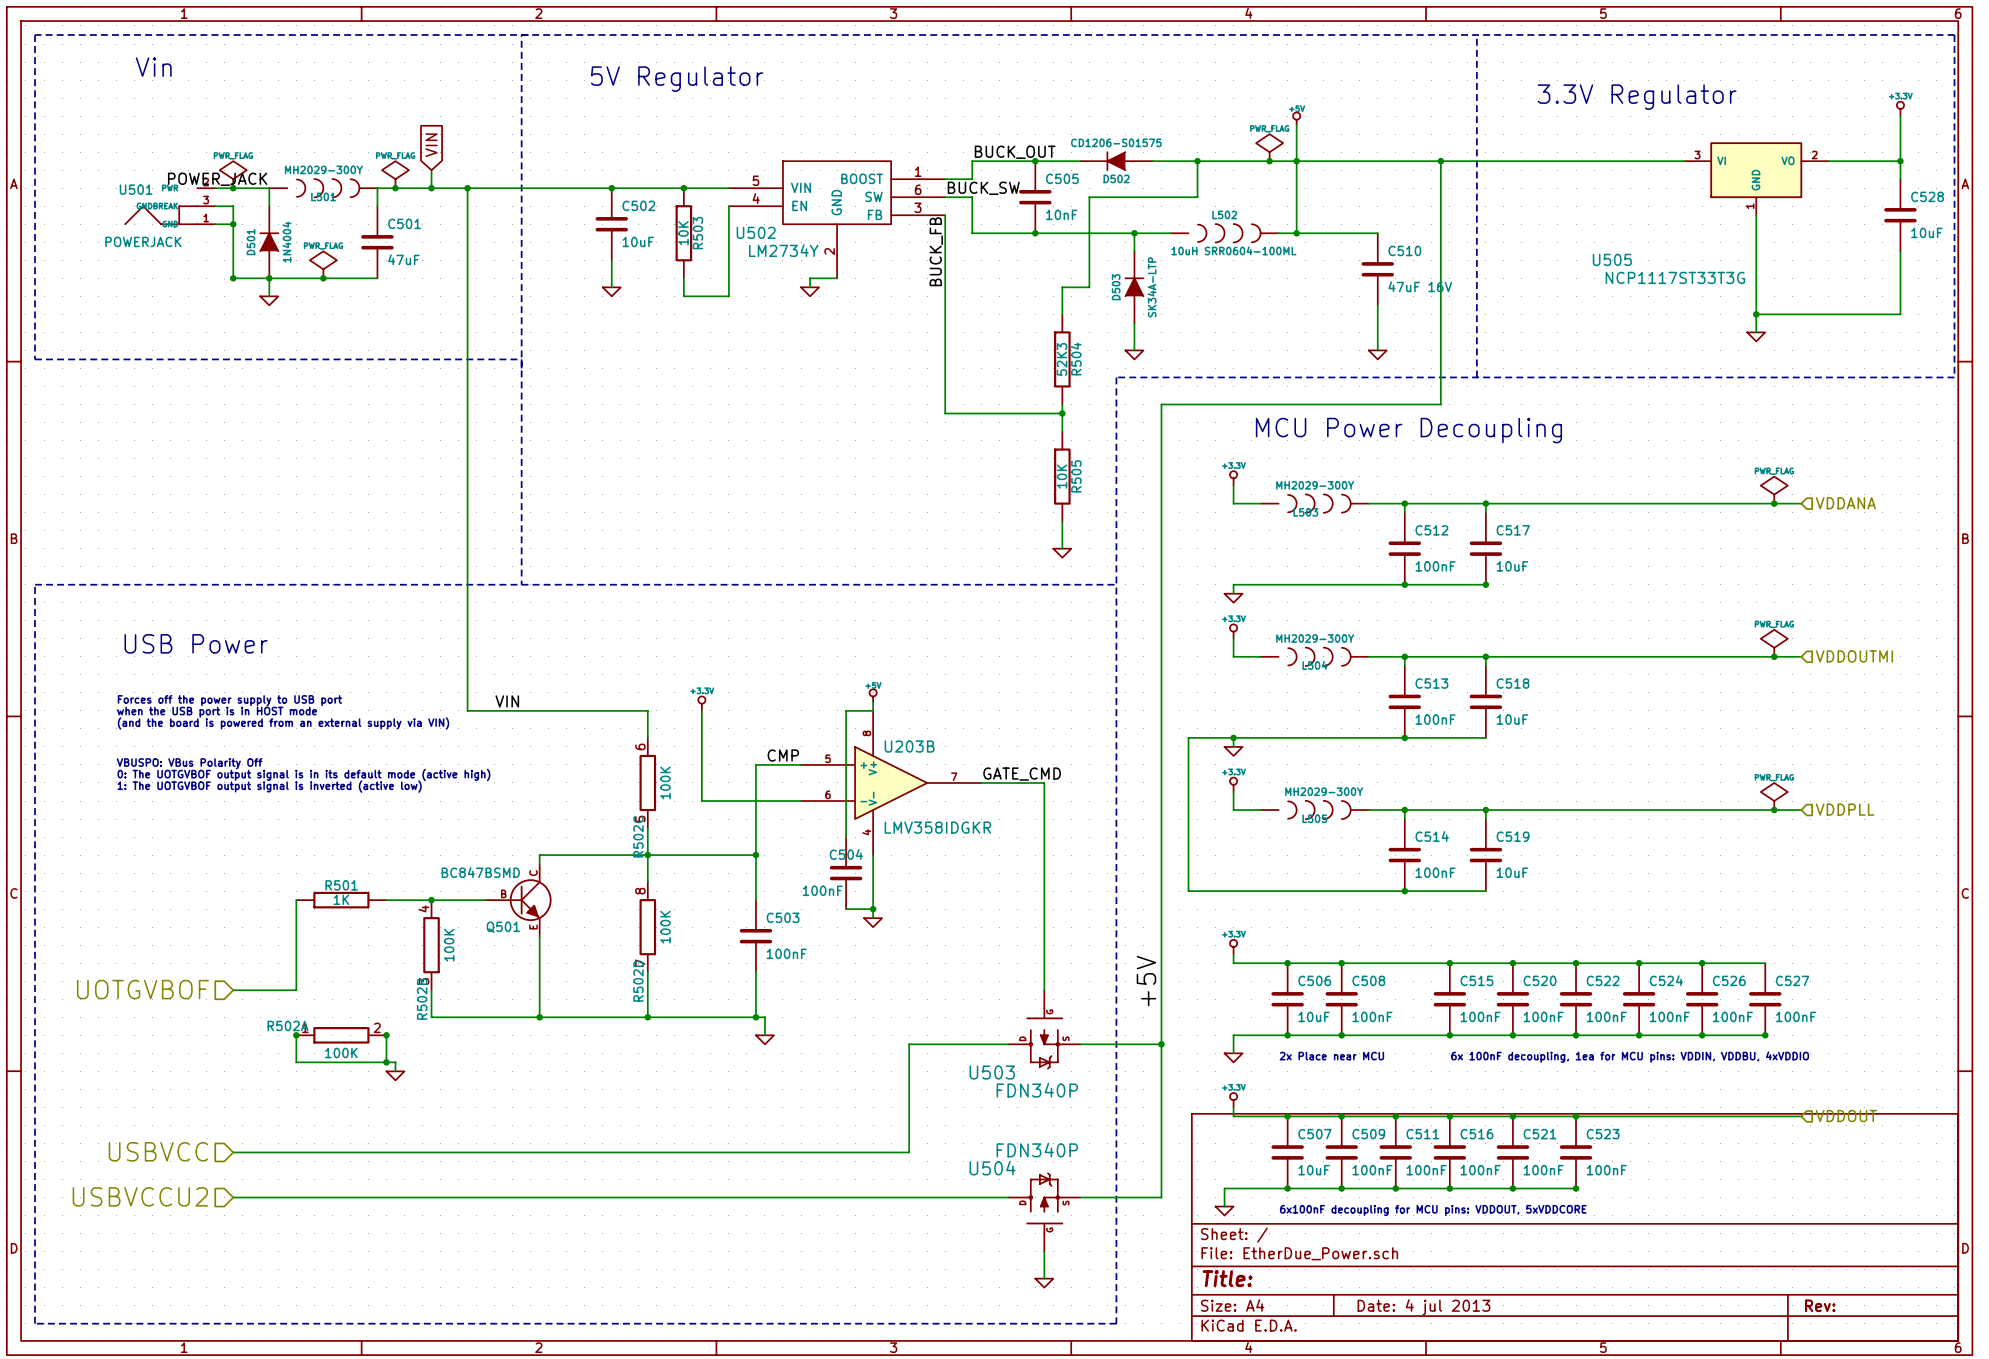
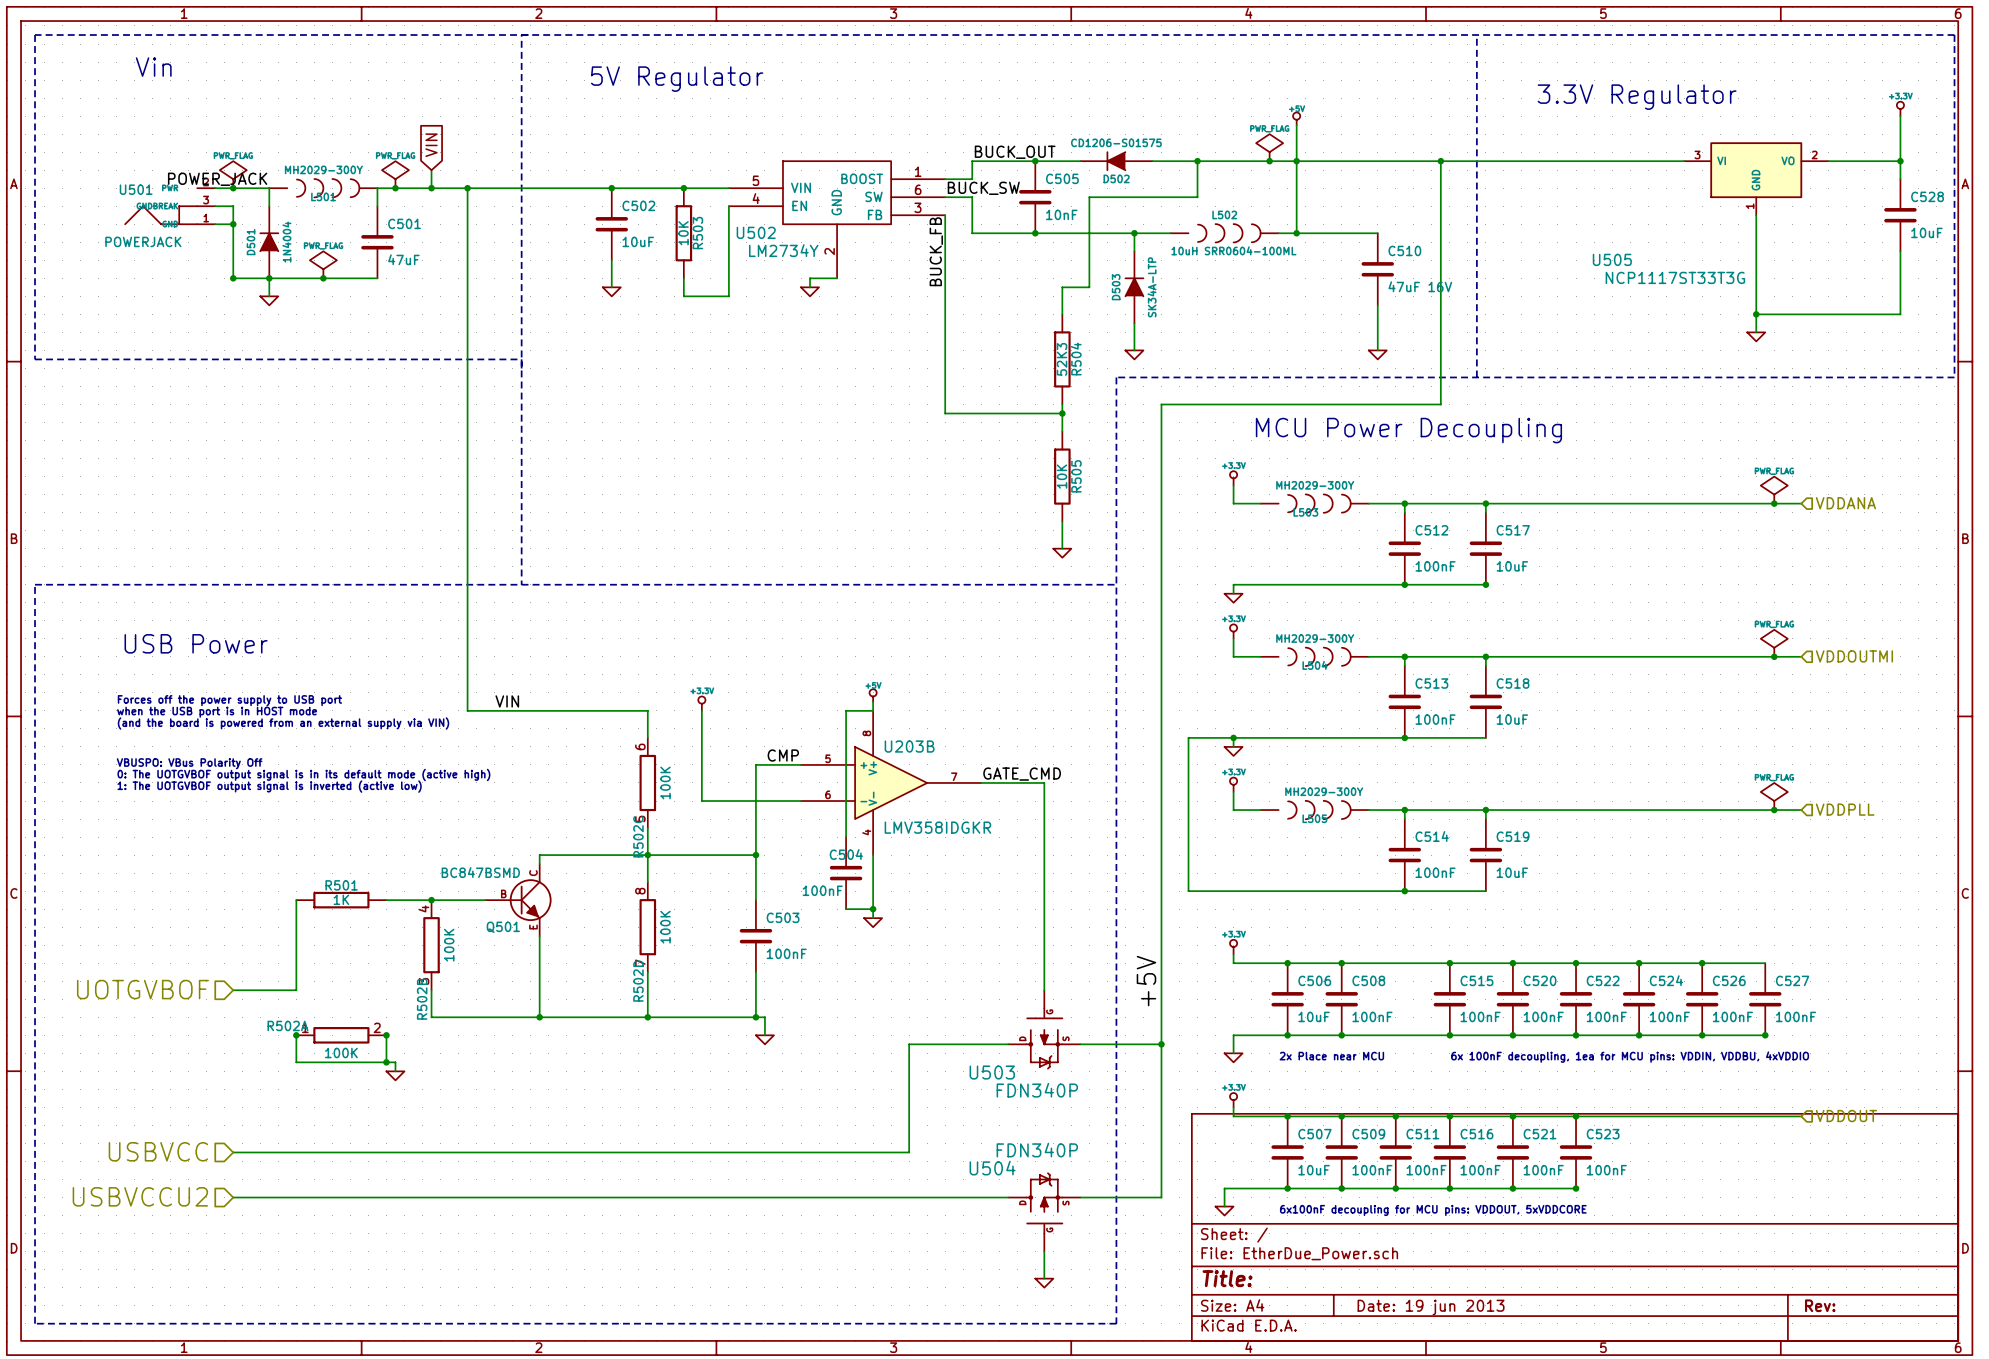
title block: Date: 4 jul 2013 (1423, 1307) -> Date: 19 jun 2013 (1431, 1307)

